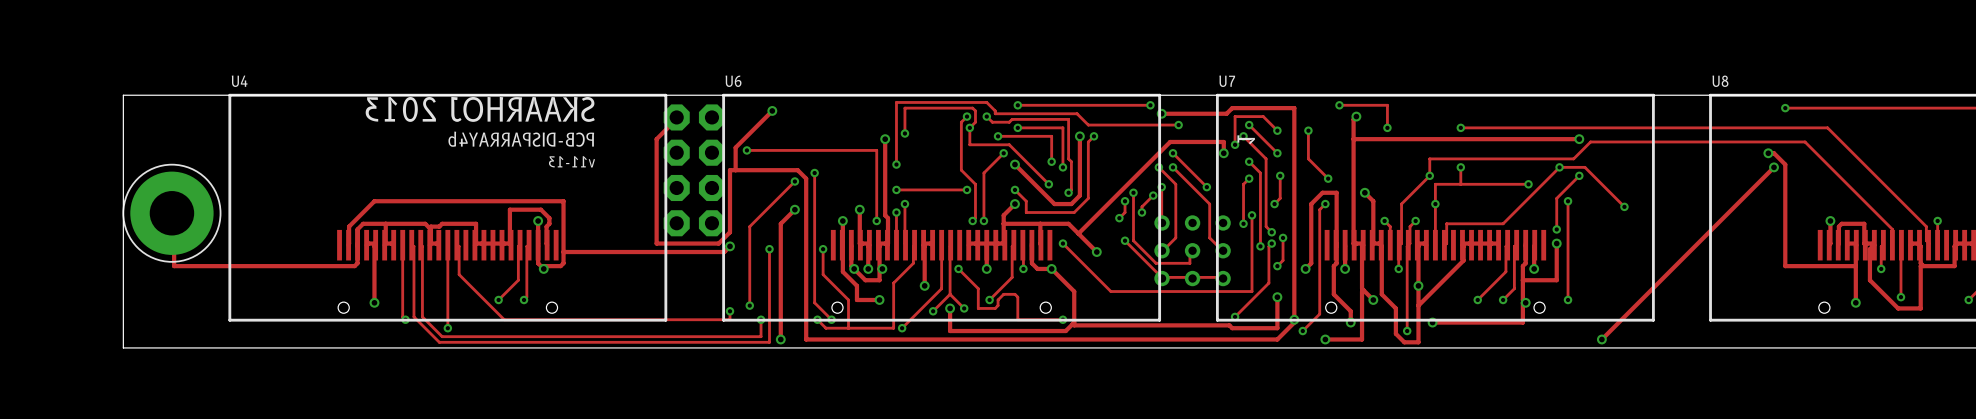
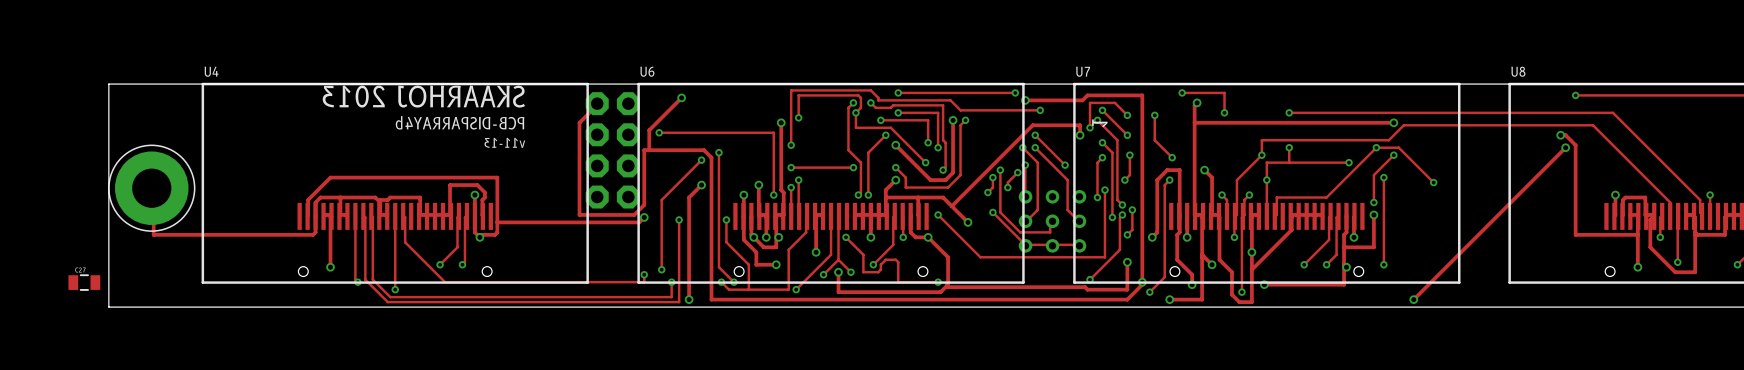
part: none -> (84, 282)

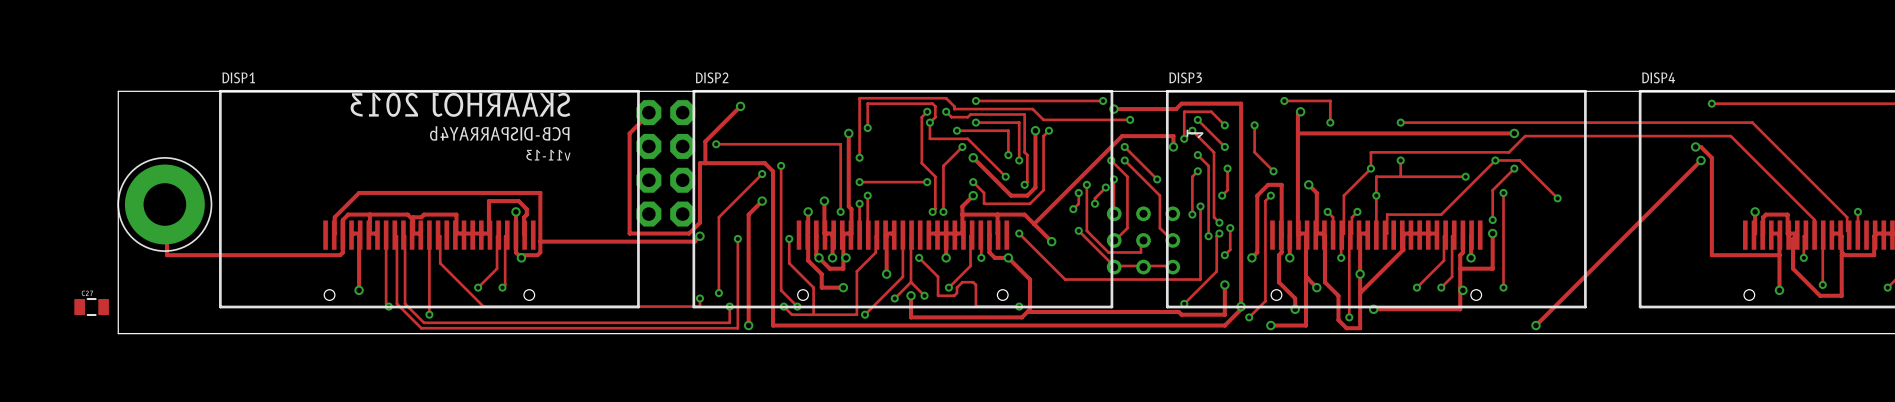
U4 name: U4 (211, 71) -> DISP1 (238, 77)
U6 name: U6 (647, 71) -> DISP2 (712, 77)
U7 name: U7 (1083, 71) -> DISP3 (1185, 77)
U8 name: U8 (1518, 71) -> DISP4 (1658, 77)

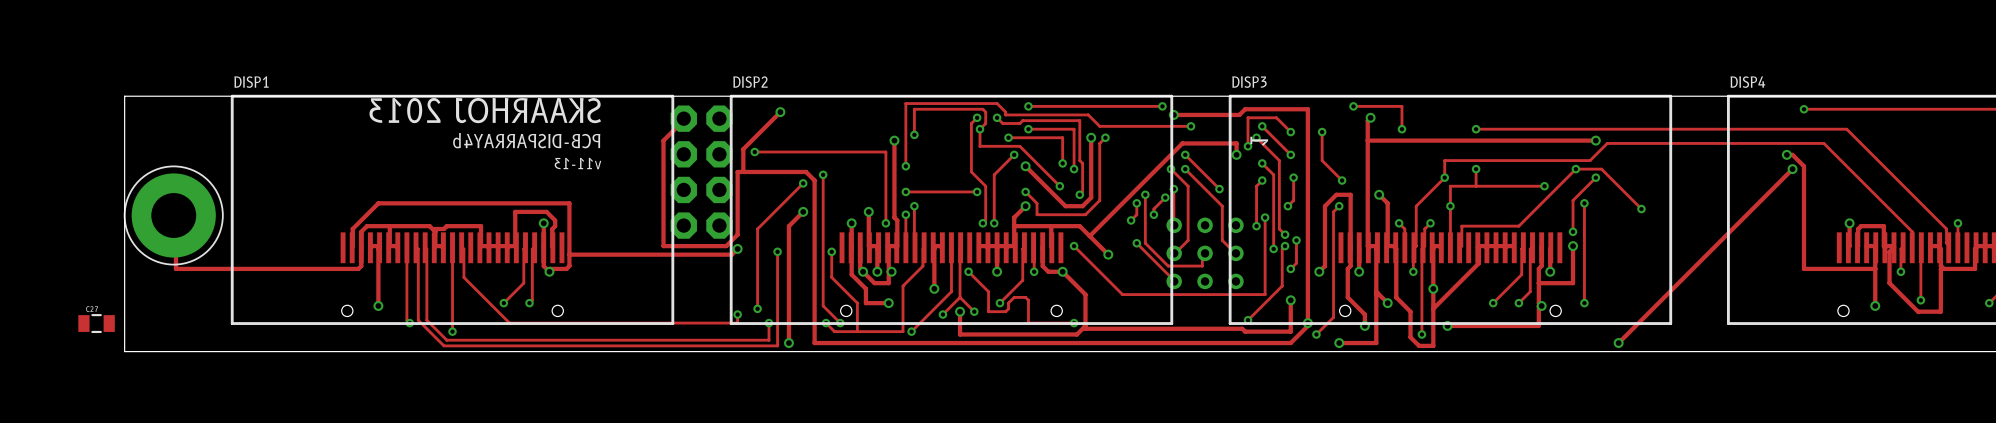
track: (1113, 266) (1172, 267) -> none

